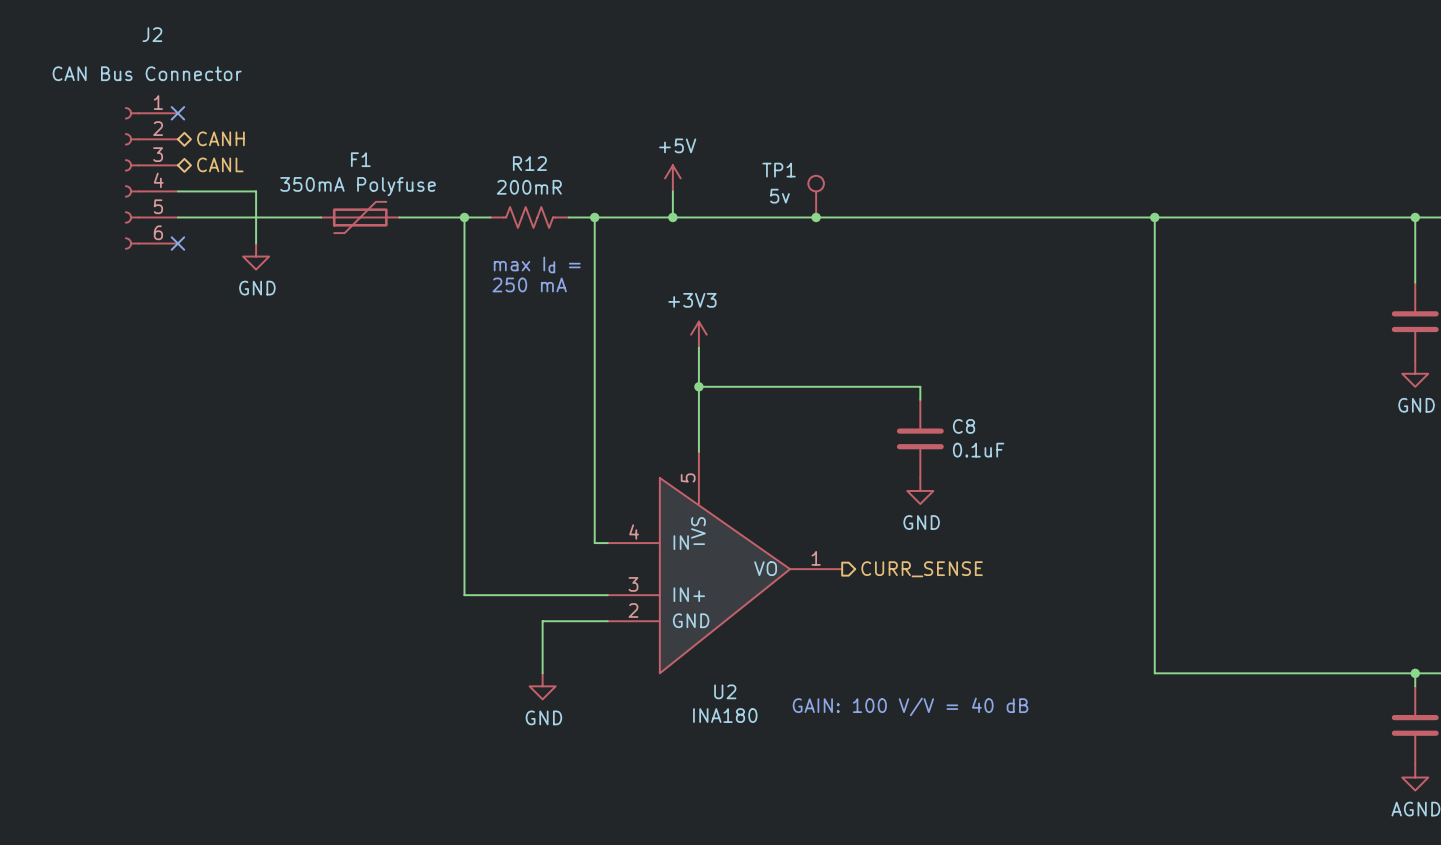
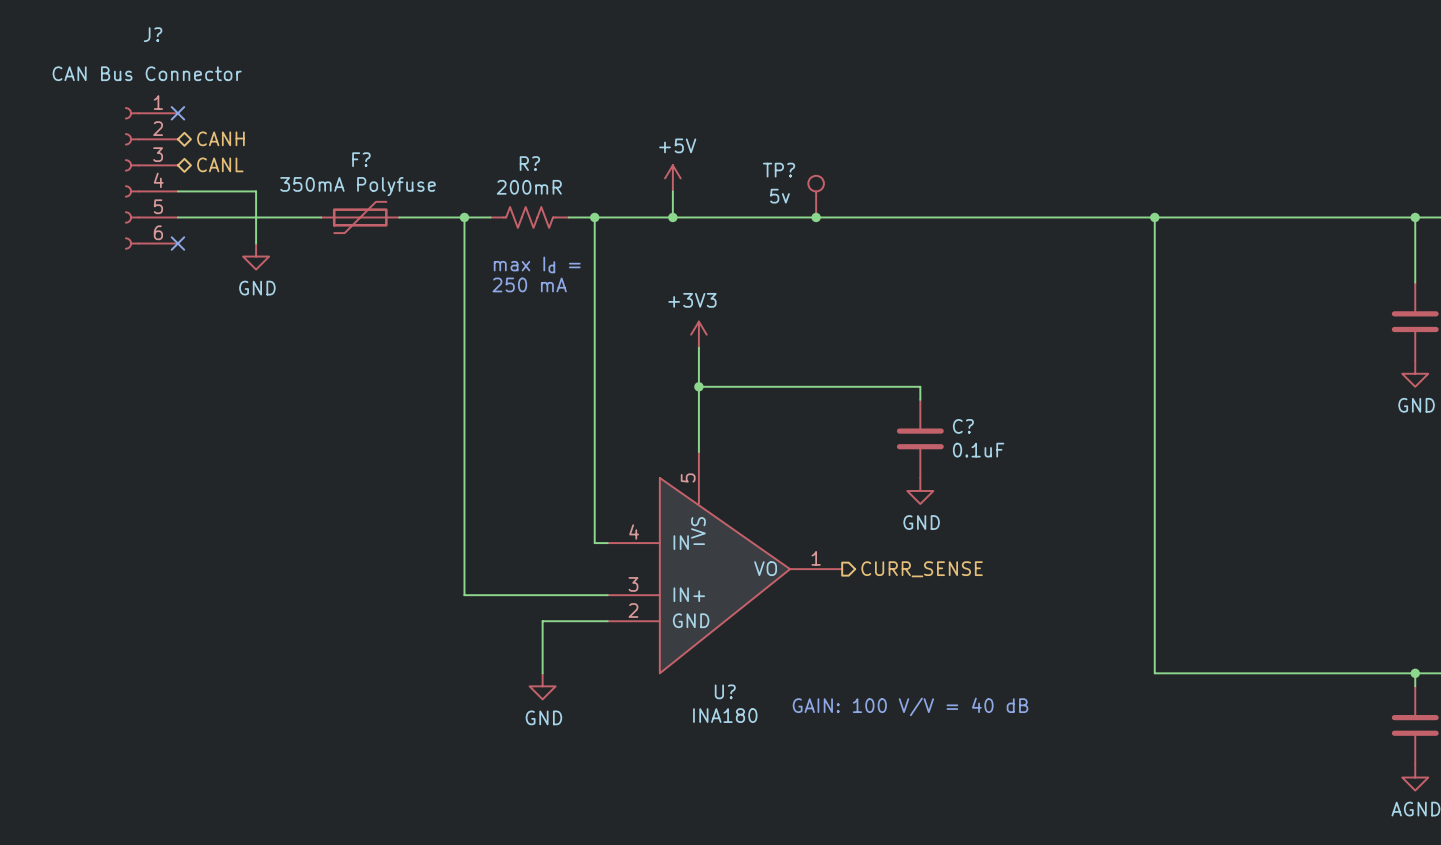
J2 name: J2 (152, 34) -> J? (153, 34)
F1 name: F1 (360, 159) -> F? (361, 159)
R12 name: R12 (529, 163) -> R? (529, 163)
TP1 name: TP1 (779, 170) -> TP? (779, 170)
C8 name: C8 (964, 426) -> C? (963, 426)
U2 name: U2 (725, 691) -> U? (725, 691)

